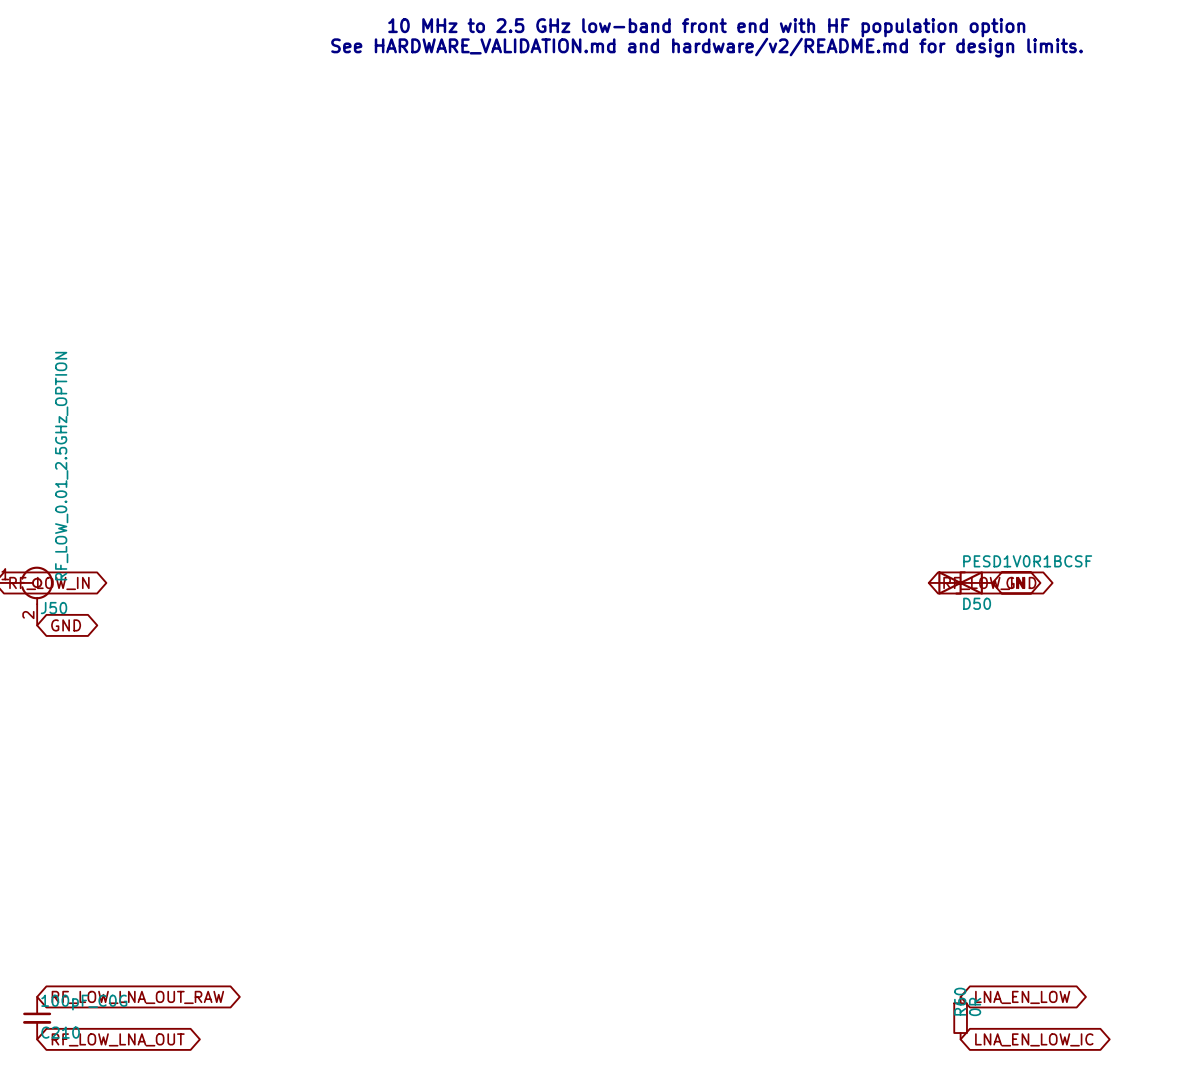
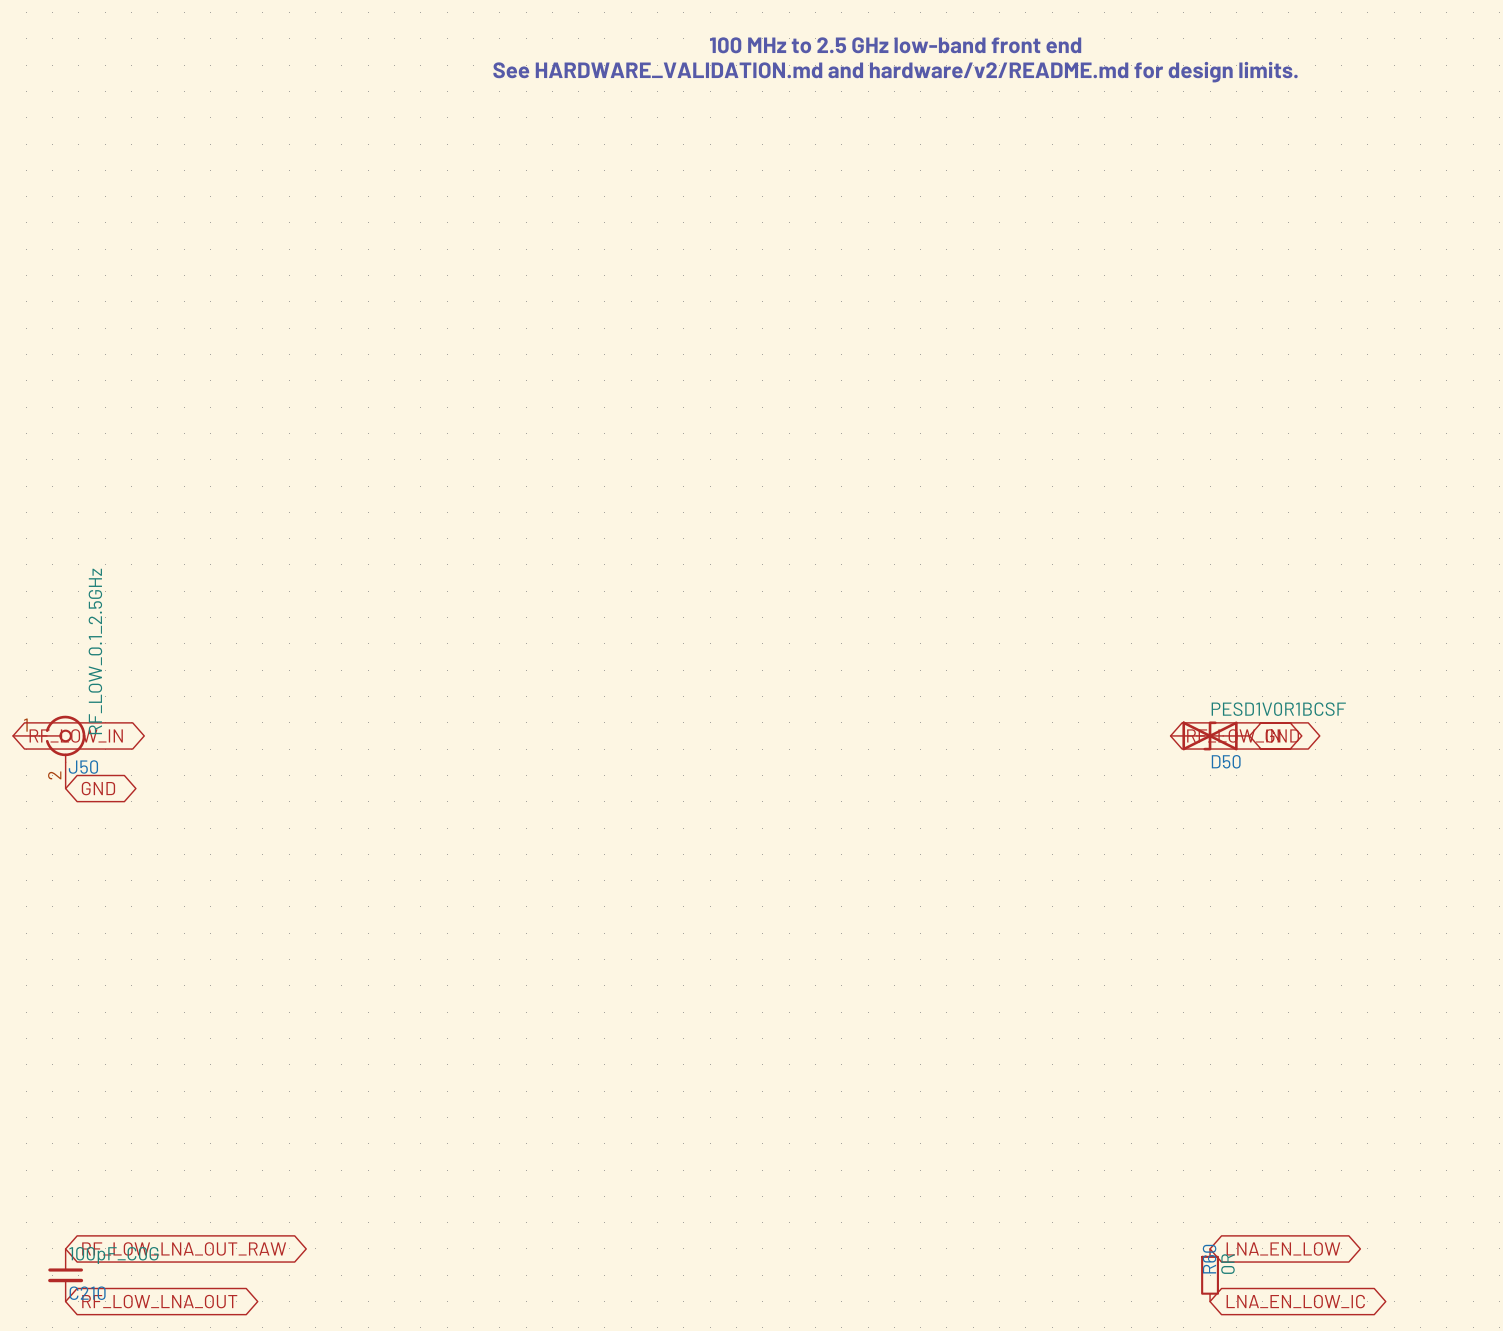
text: 10 MHz to 2.5 GHz low-band front end with HF population option (706, 27) -> 100 MHz to 2.5 GHz low-band front end (895, 45)
J50 value: RF_LOW_0.01_2.5GHz_OPTION (61, 466) -> RF_LOW_0.1_2.5GHz (95, 651)

